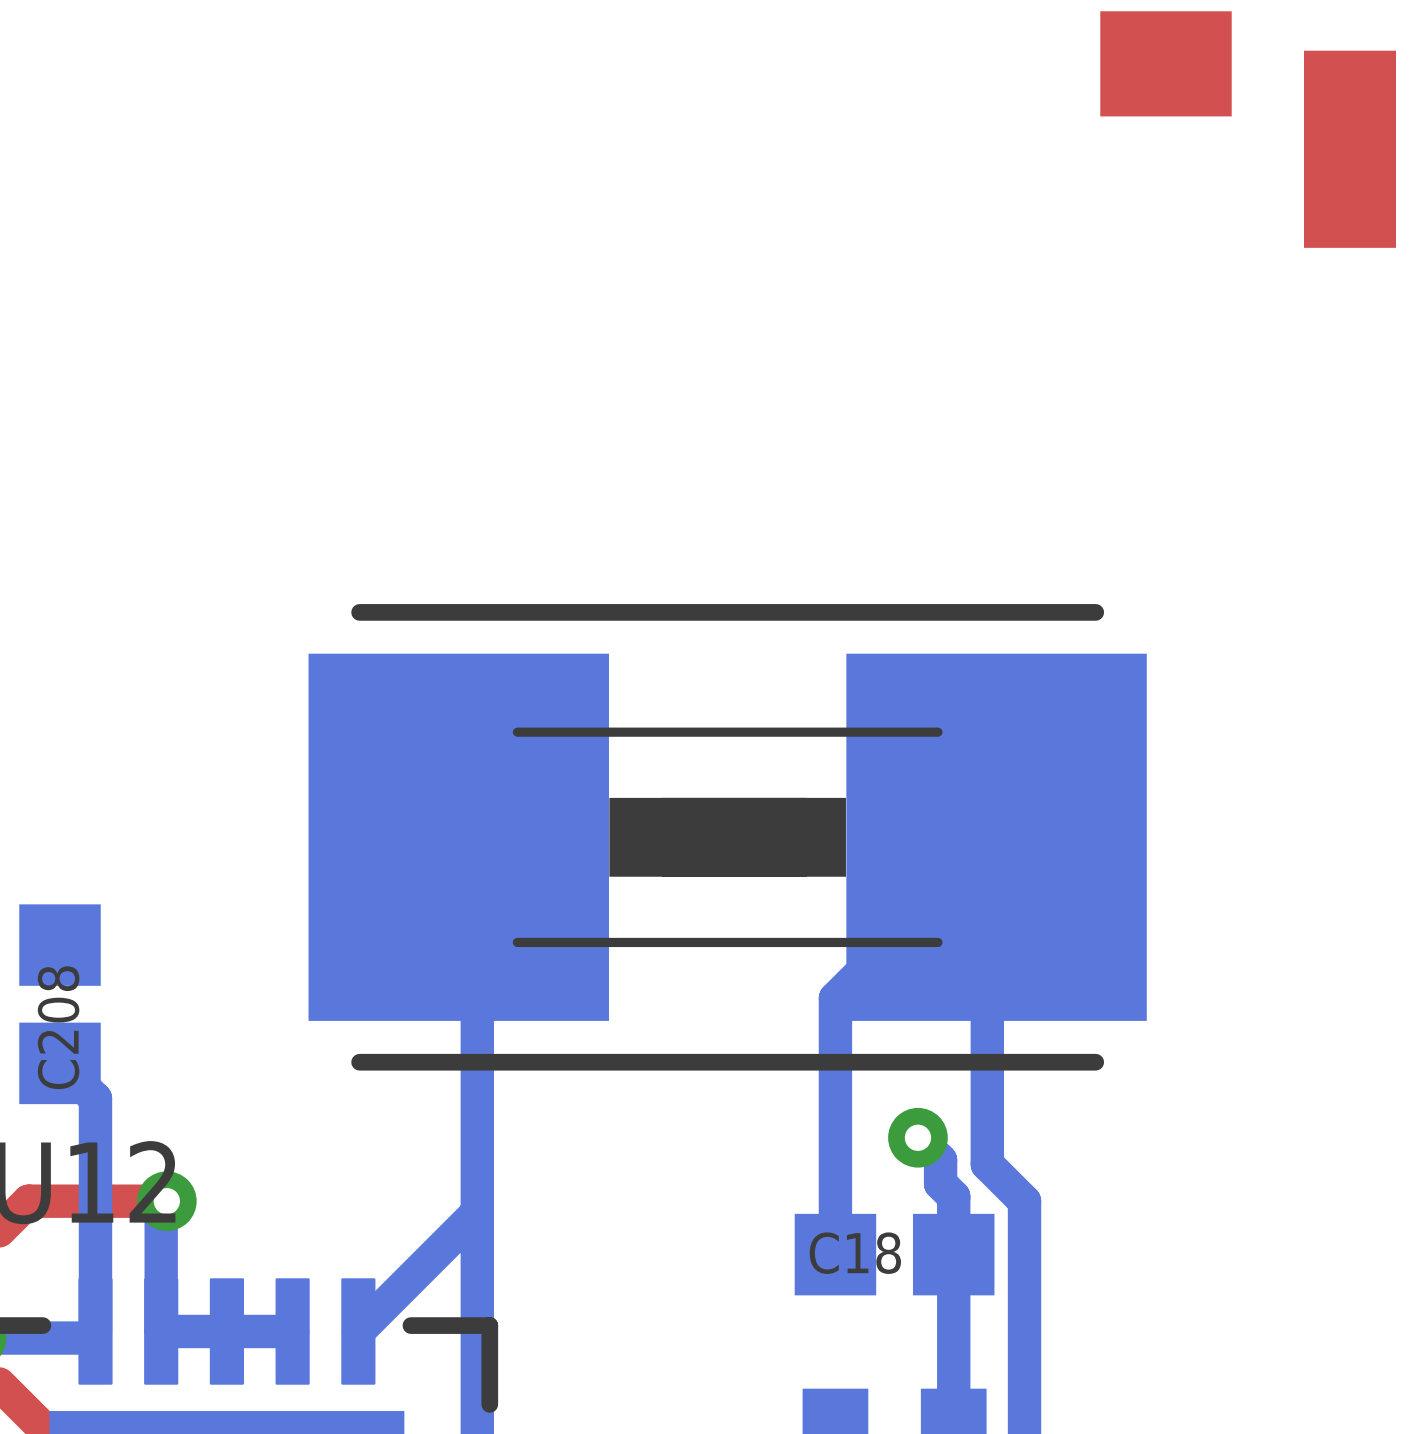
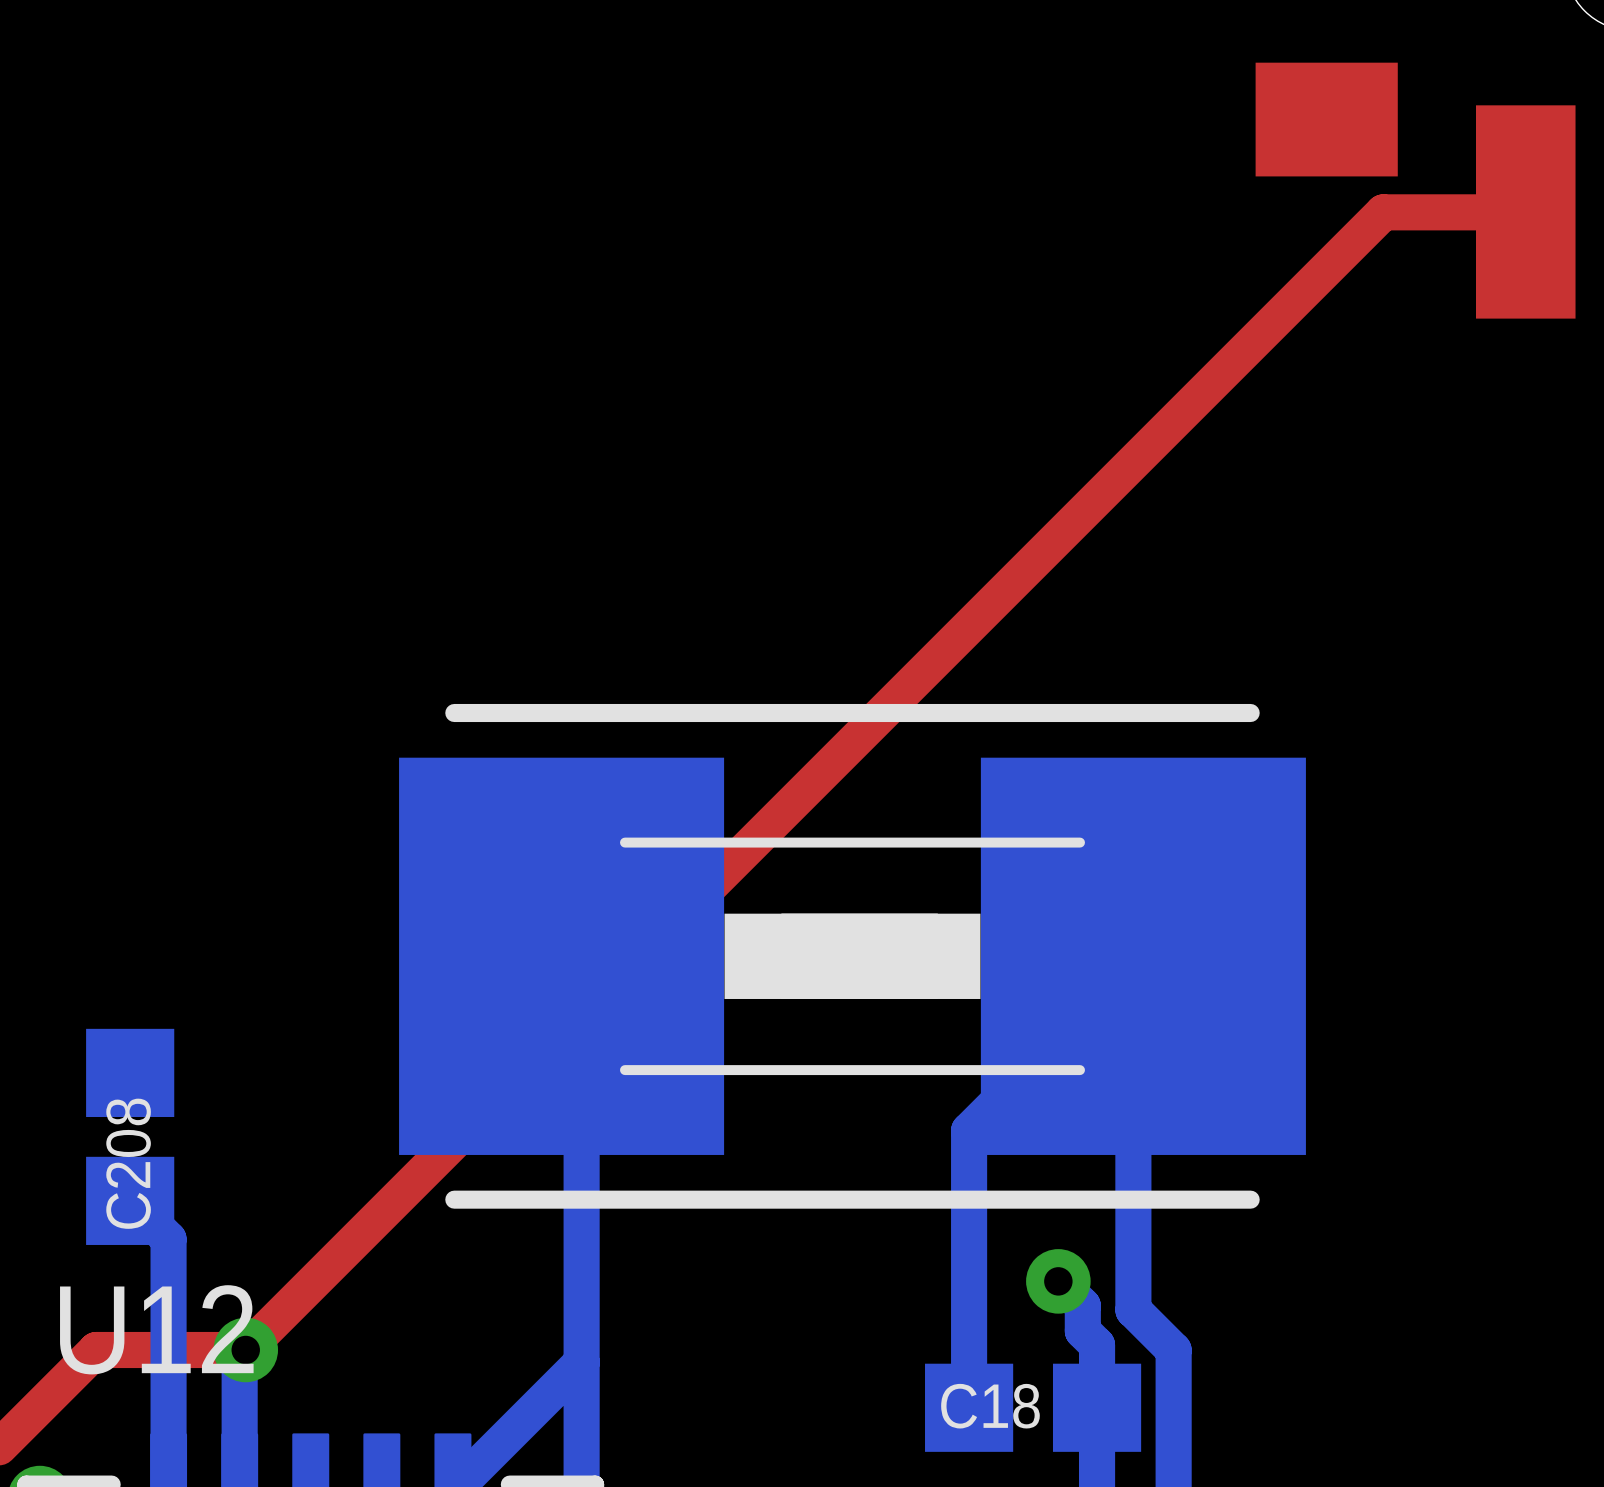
top track: none -> (1525, 211) (1383, 212) (245, 1349)

